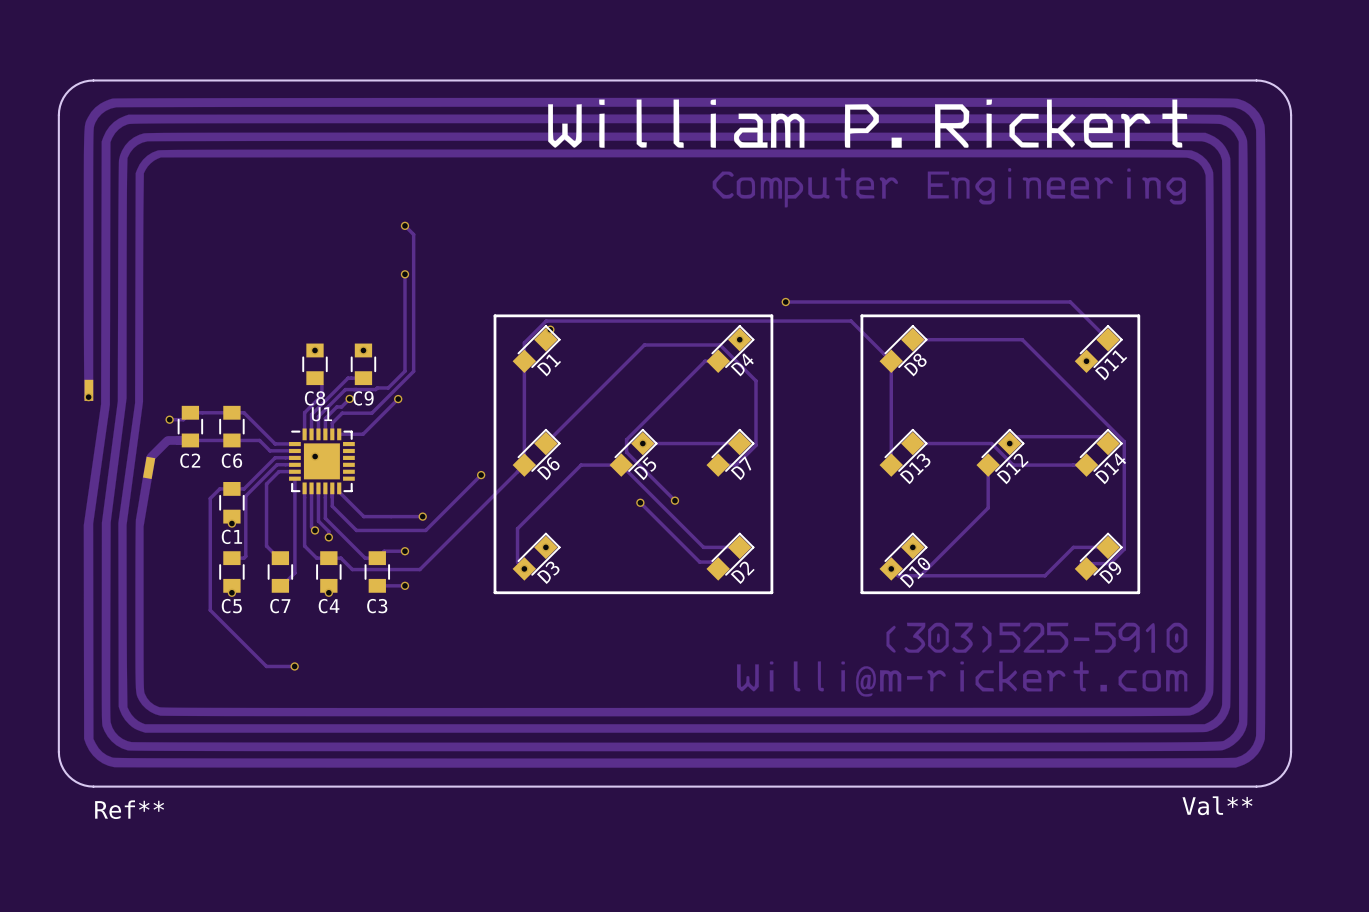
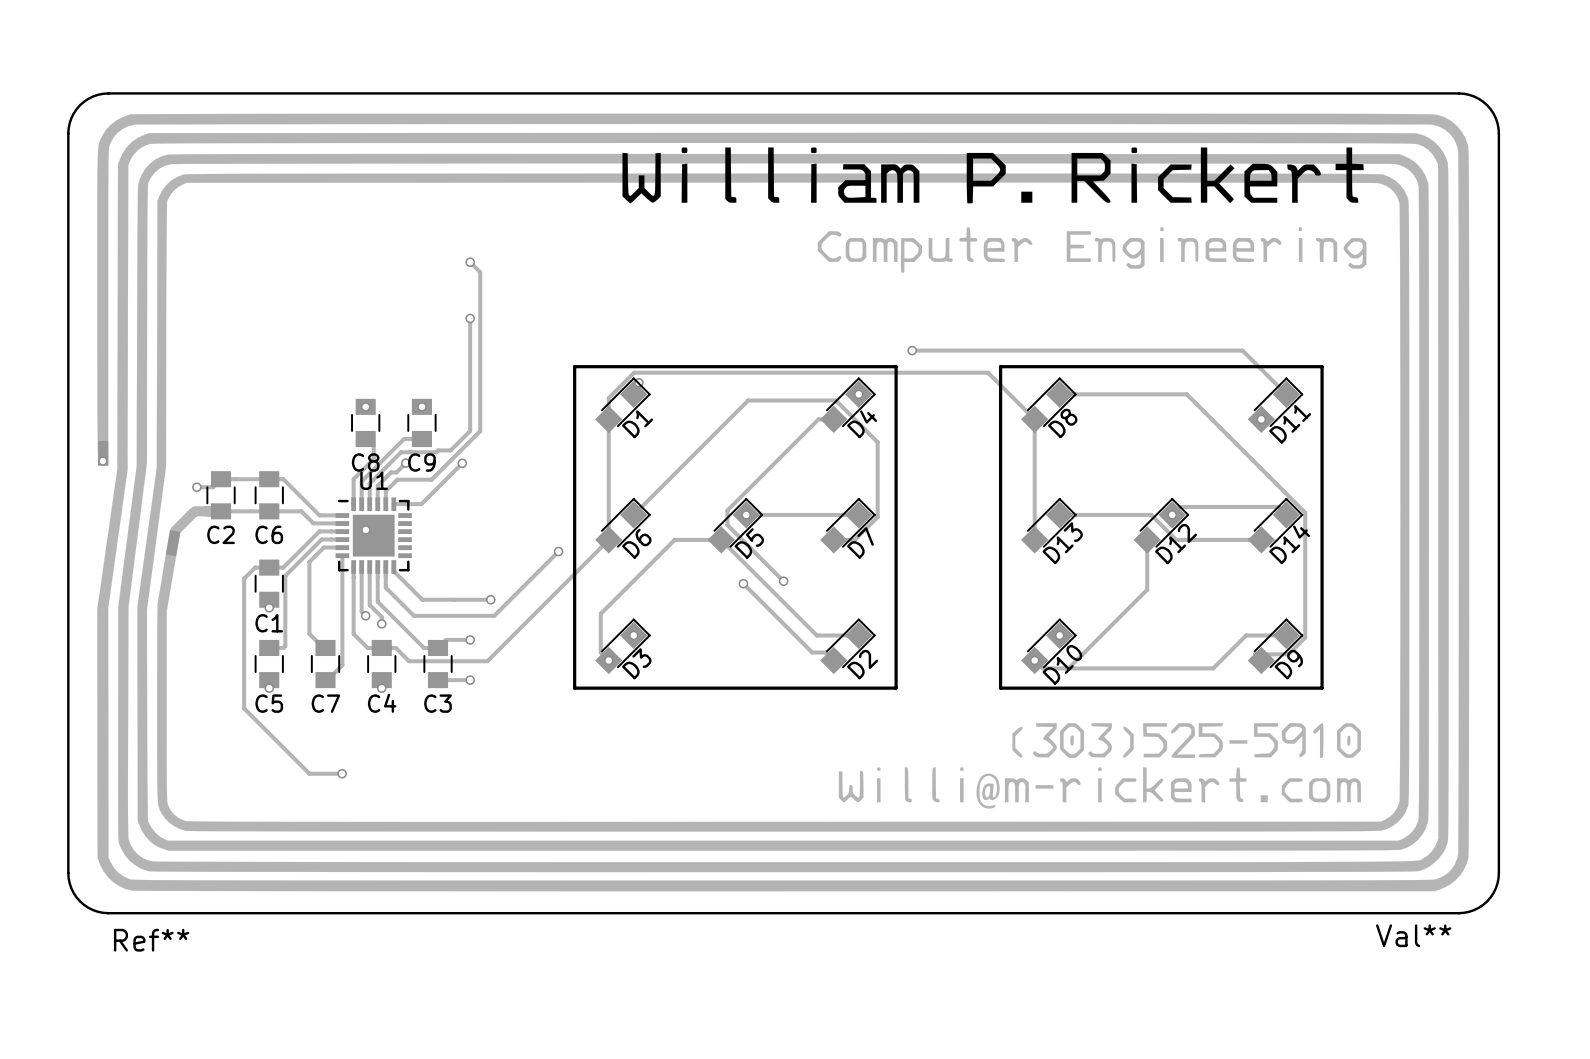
drawing: [548, 99, 1188, 148] -> none
drawing: none -> [622, 147, 1367, 809]
drawing: [712, 168, 1186, 208] -> none
drawing: [736, 622, 1188, 697] -> none

